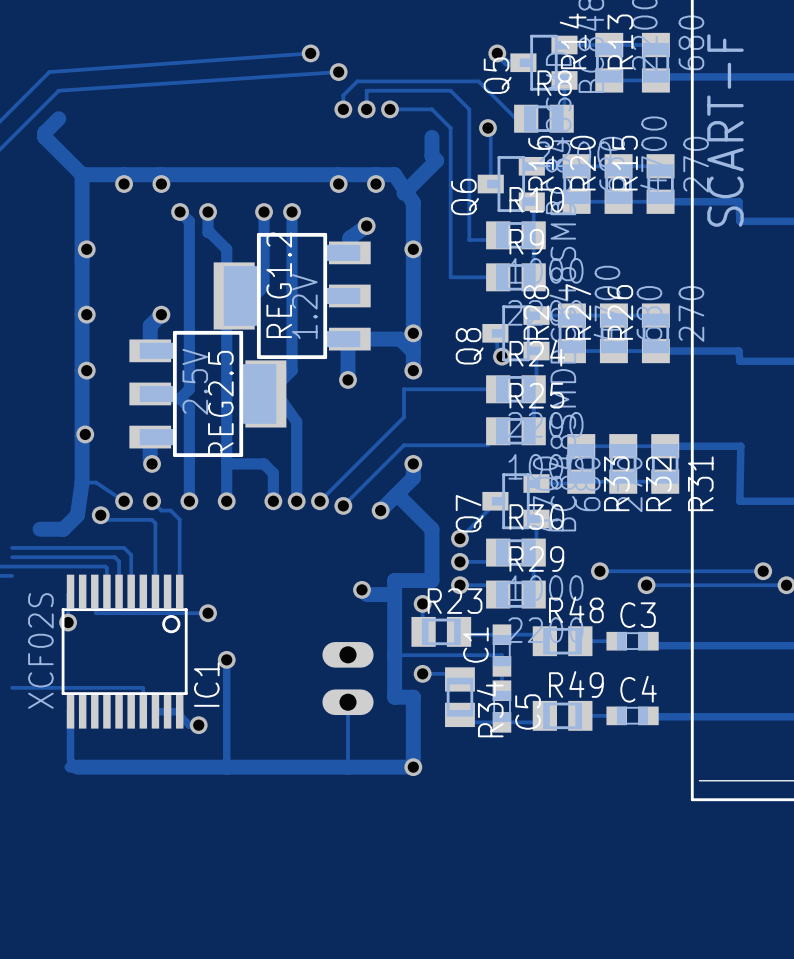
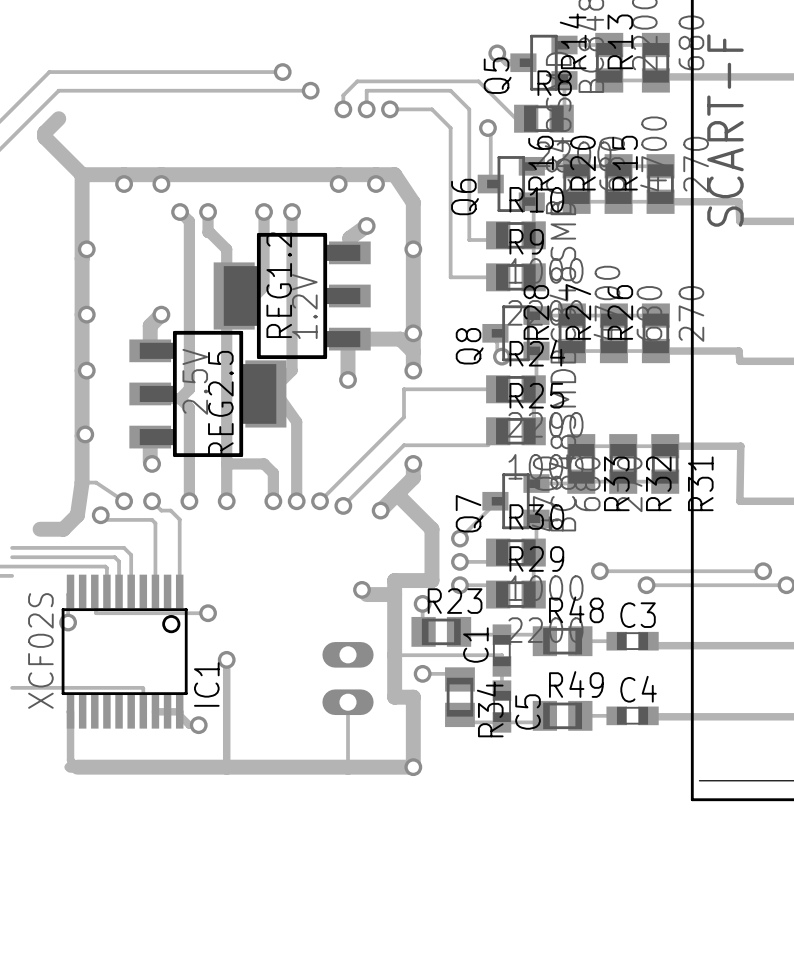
track: (310, 53) (49, 72) -> (282, 72) (49, 72)
via: (310, 53) -> none
via: none -> (282, 72)
track: (338, 72) (58, 90) -> (310, 90) (58, 90)
via: (338, 72) -> none
via: none -> (310, 90)
track: (431, 137) (431, 156) (436, 160) (403, 193) -> none

